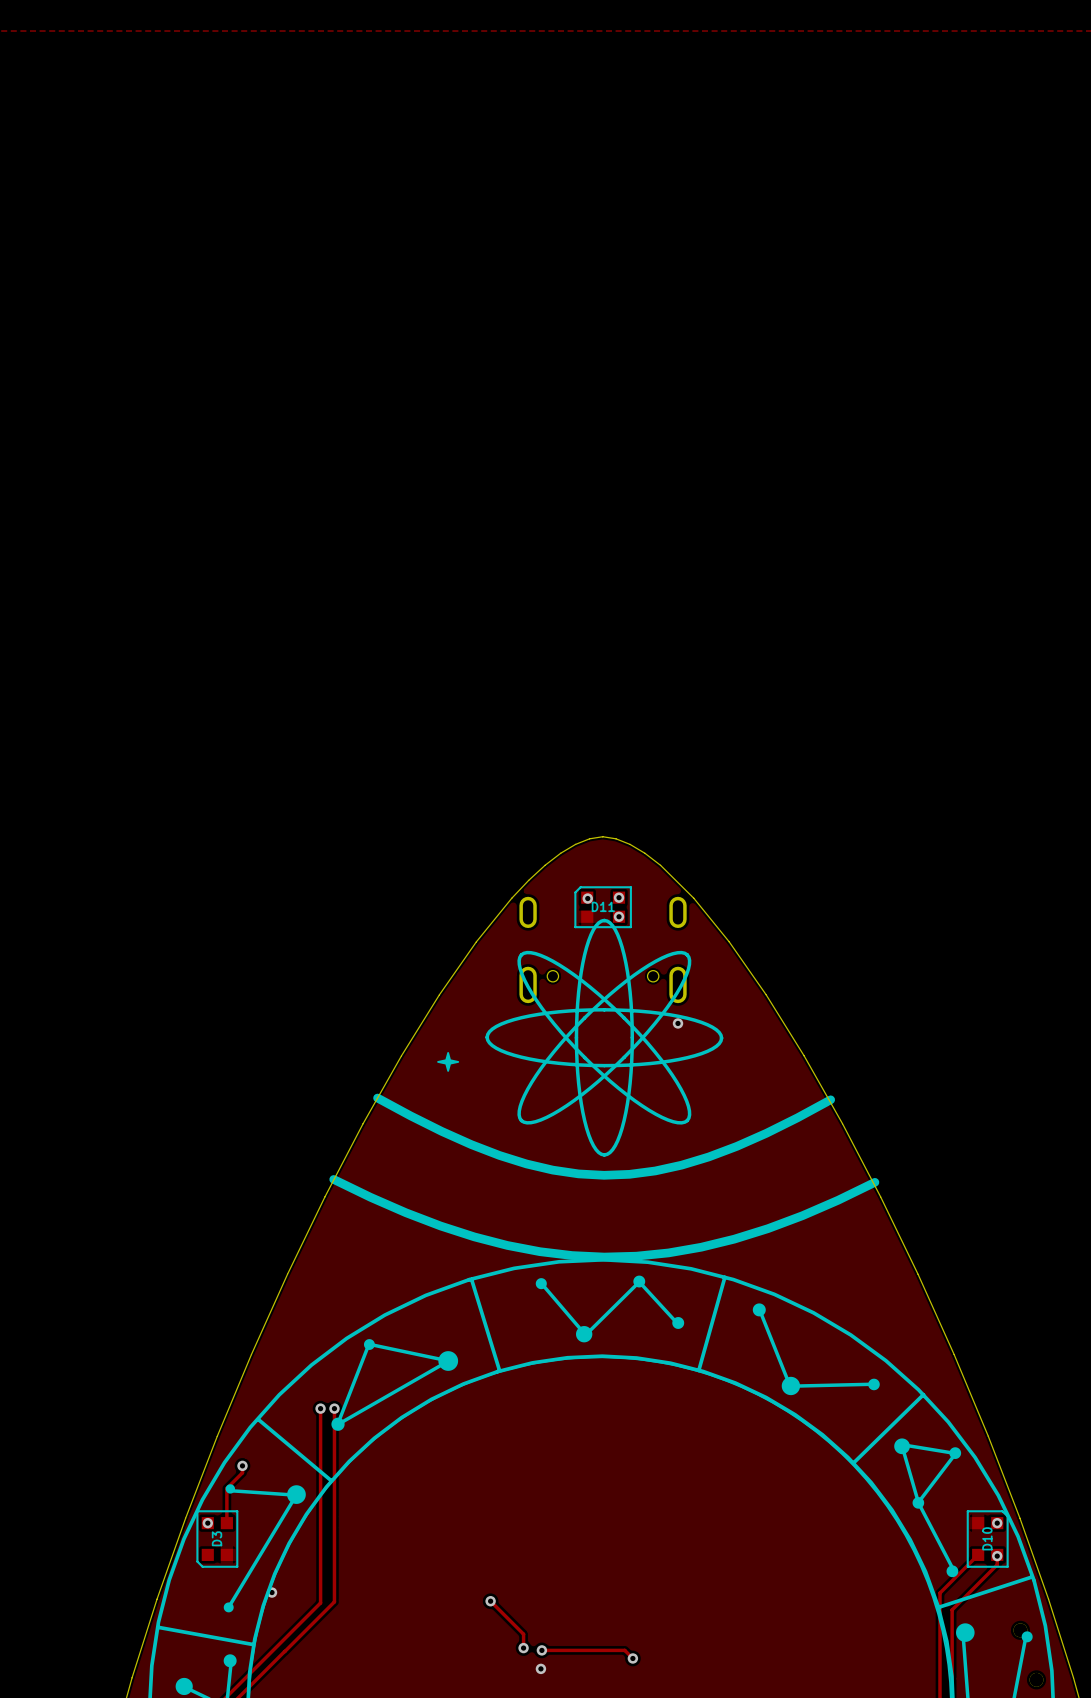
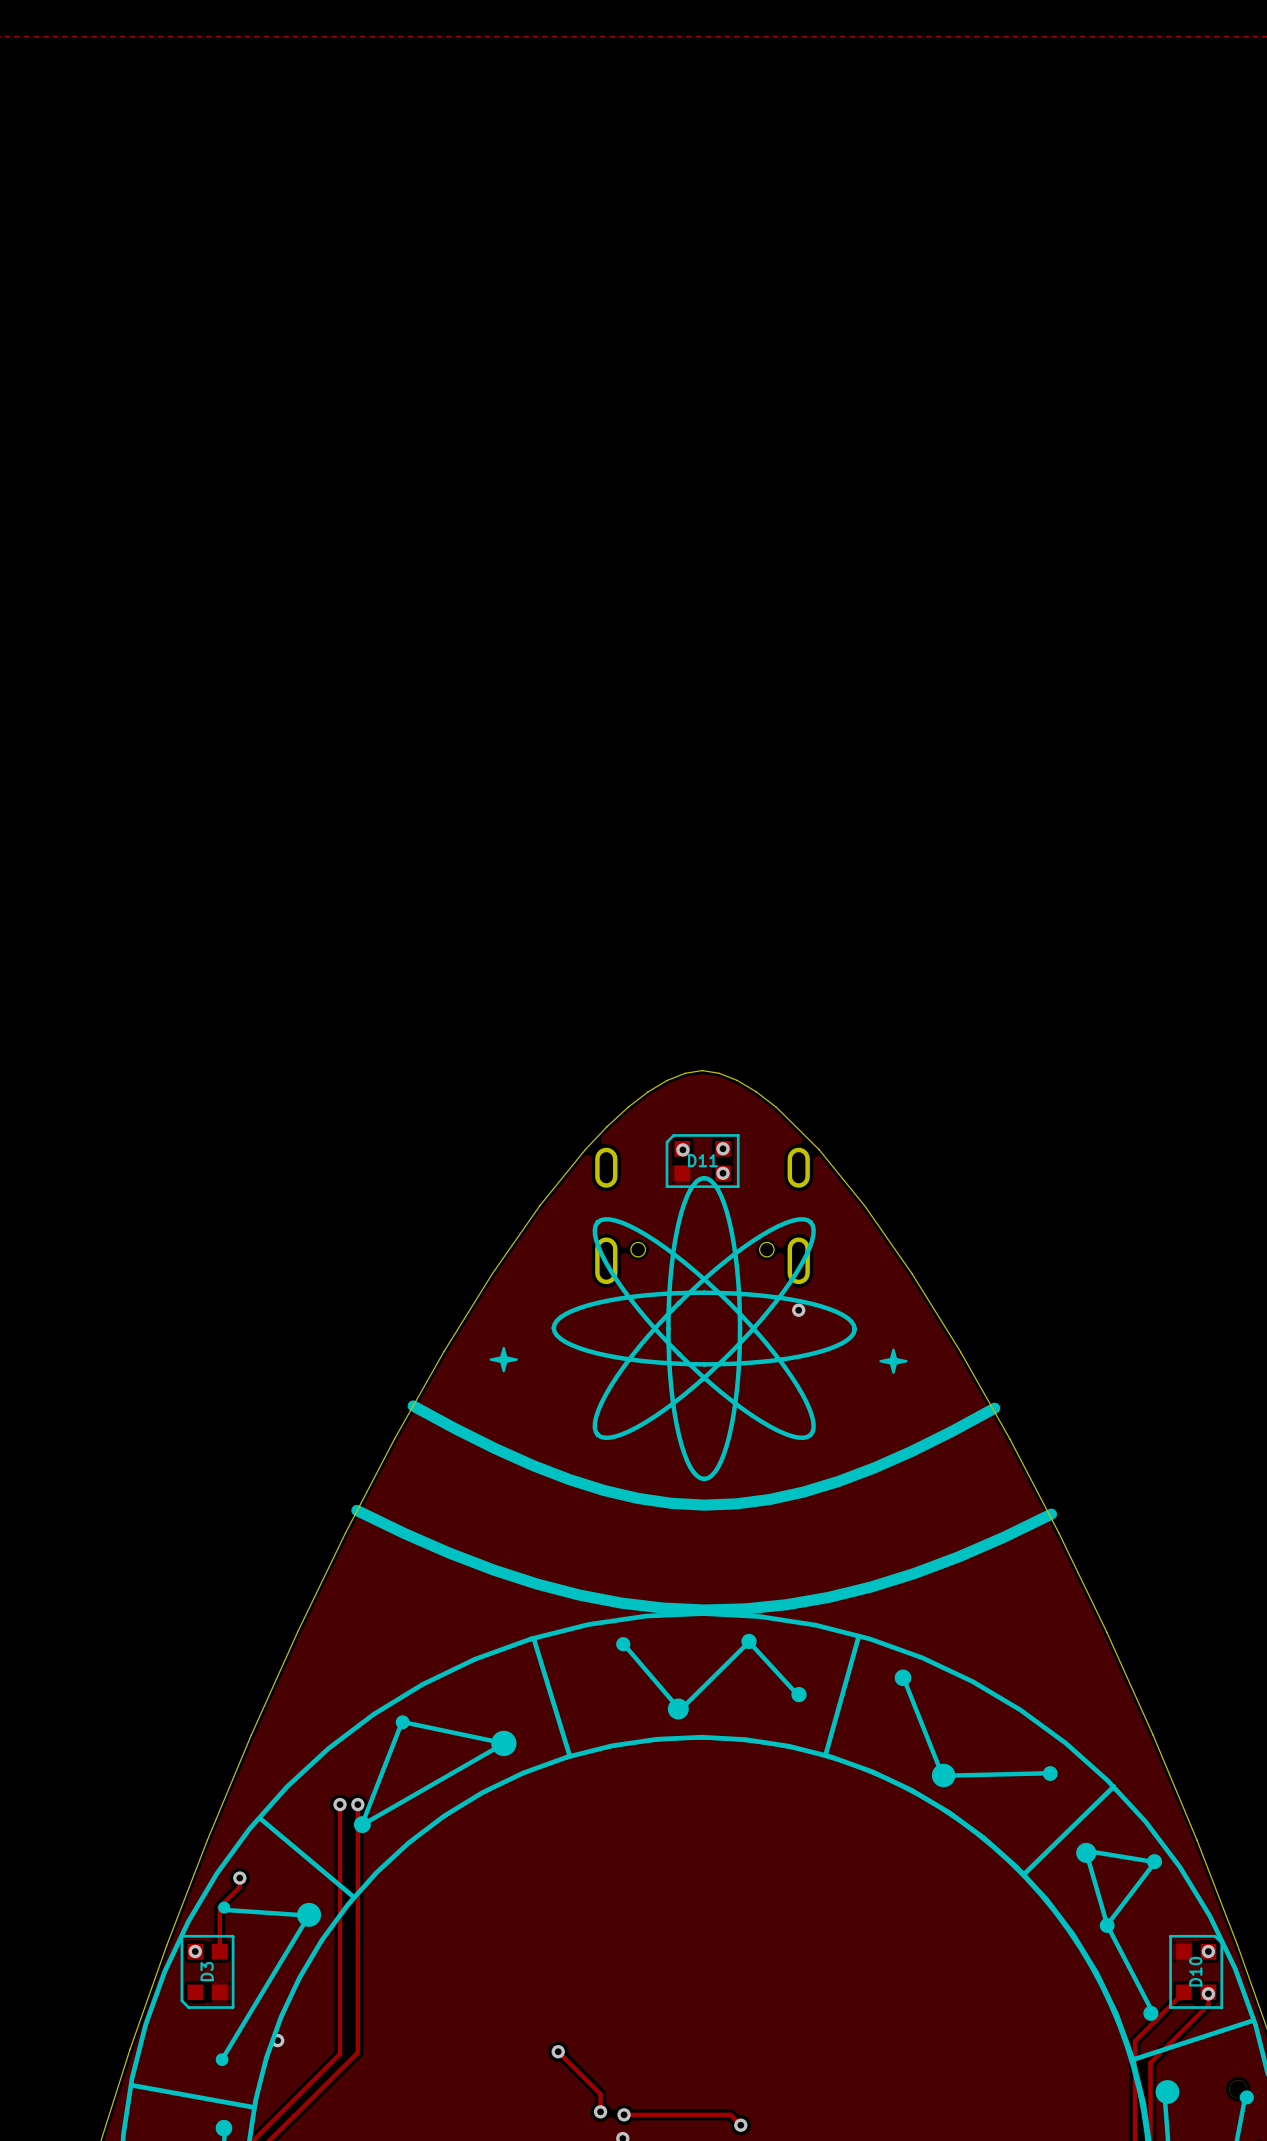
drawing: none -> [879, 1348, 908, 1374]

